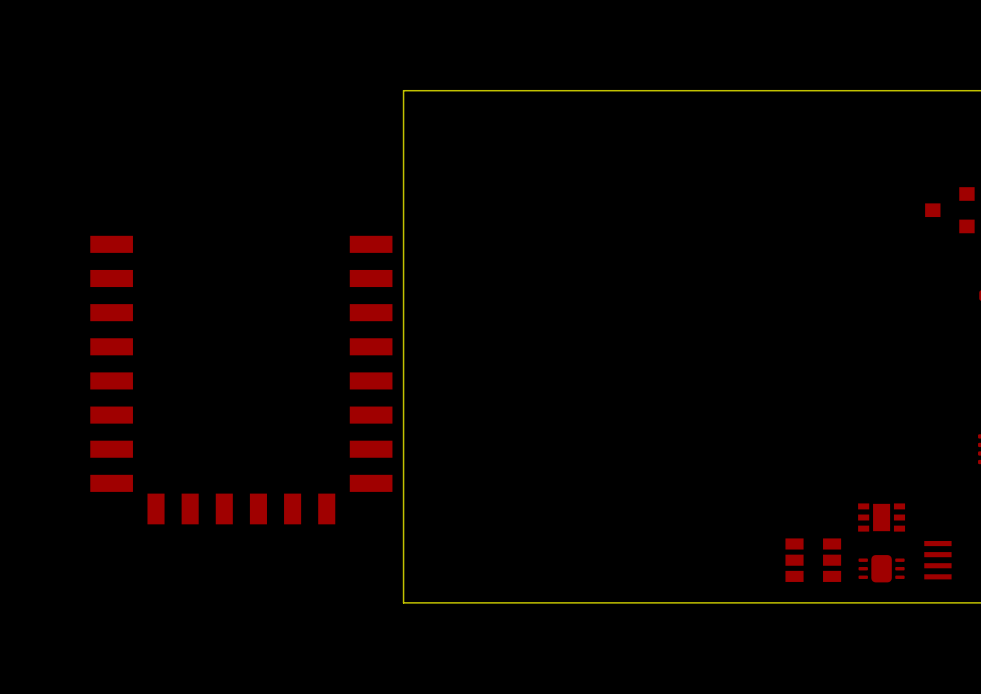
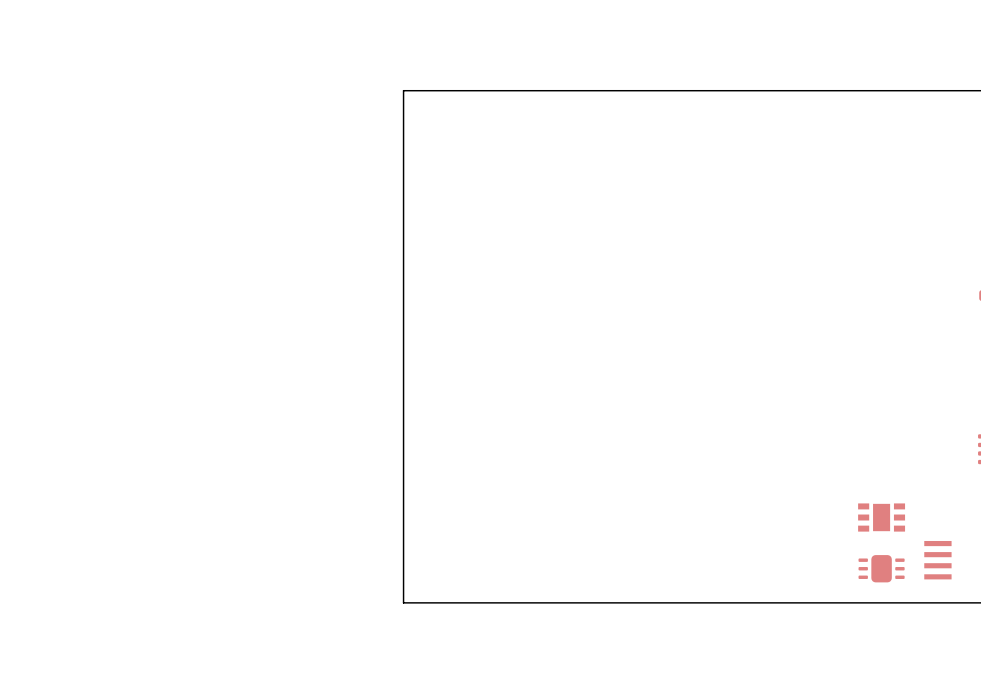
part: (949, 210) -> none
part: (241, 380) -> none
part: (813, 560) -> none

